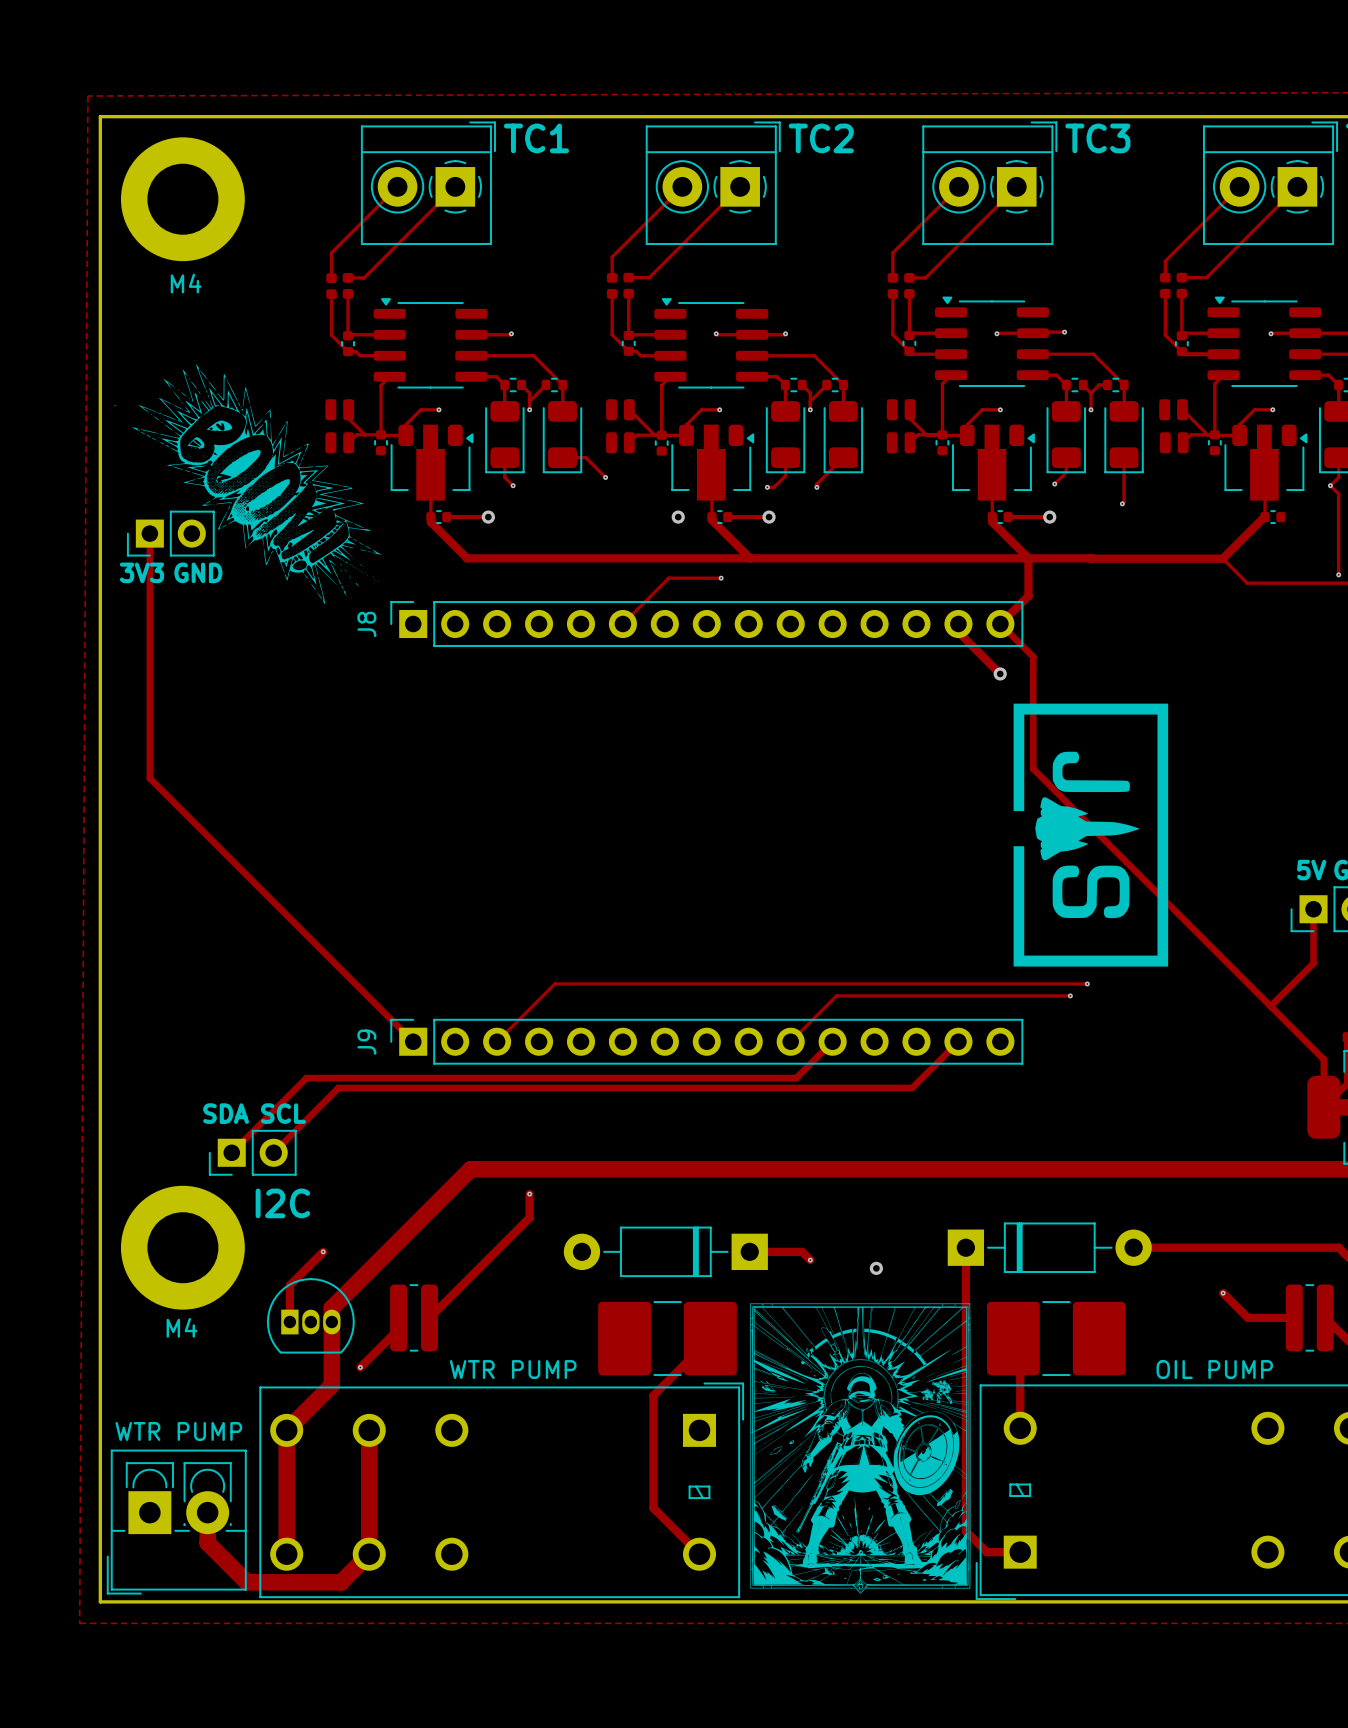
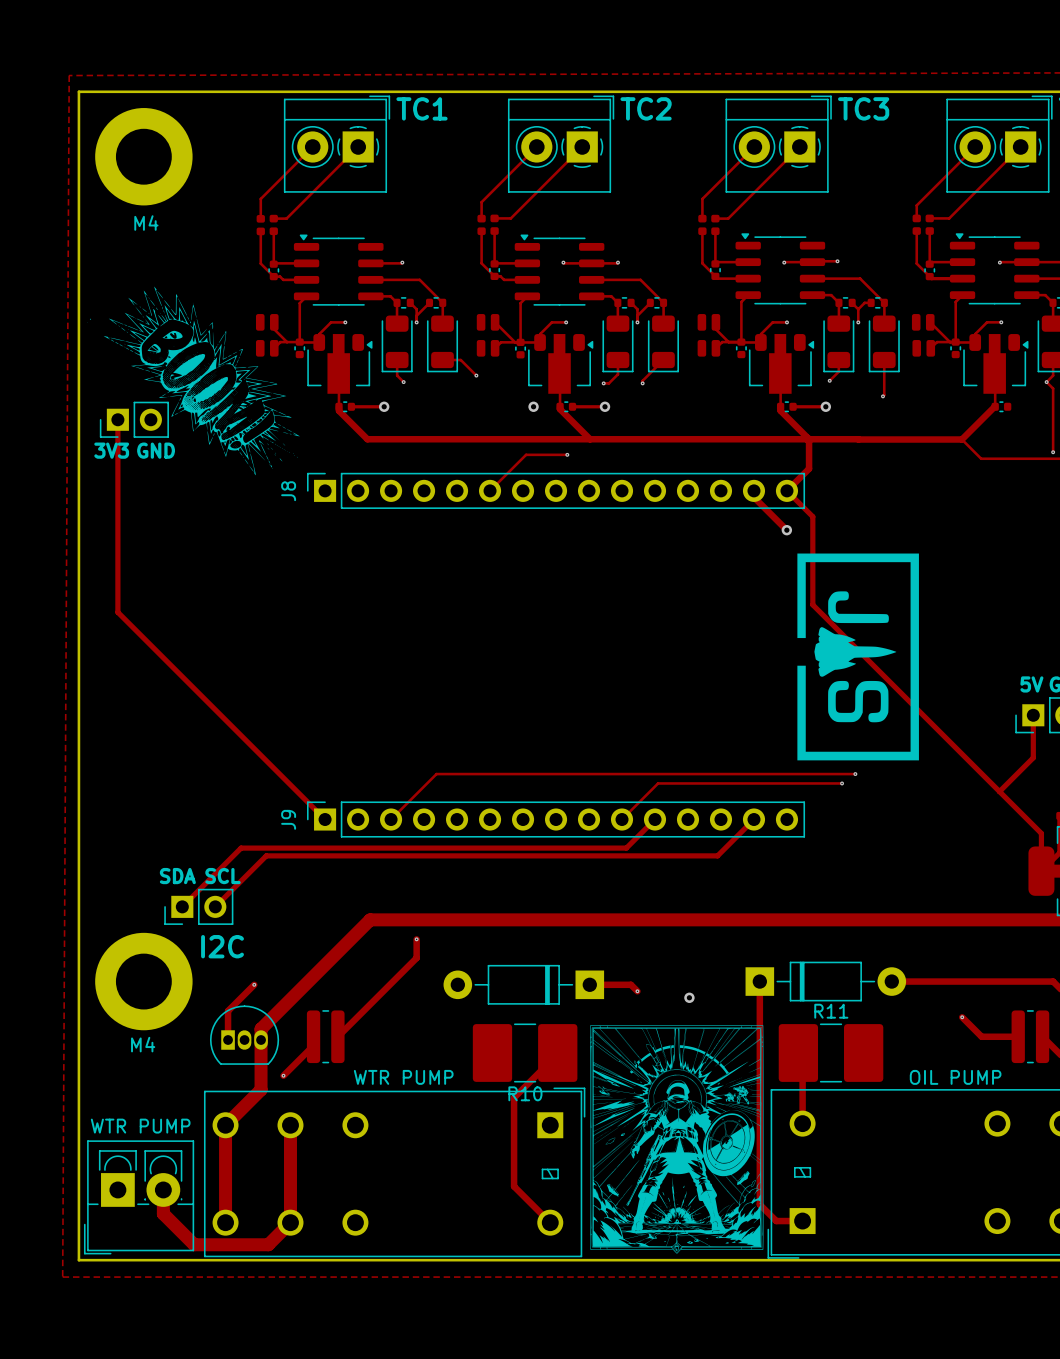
part: (667, 1338) -> none
R10: none -> (525, 1053)
part: (1056, 1338) -> none
R11: none -> (831, 1053)

